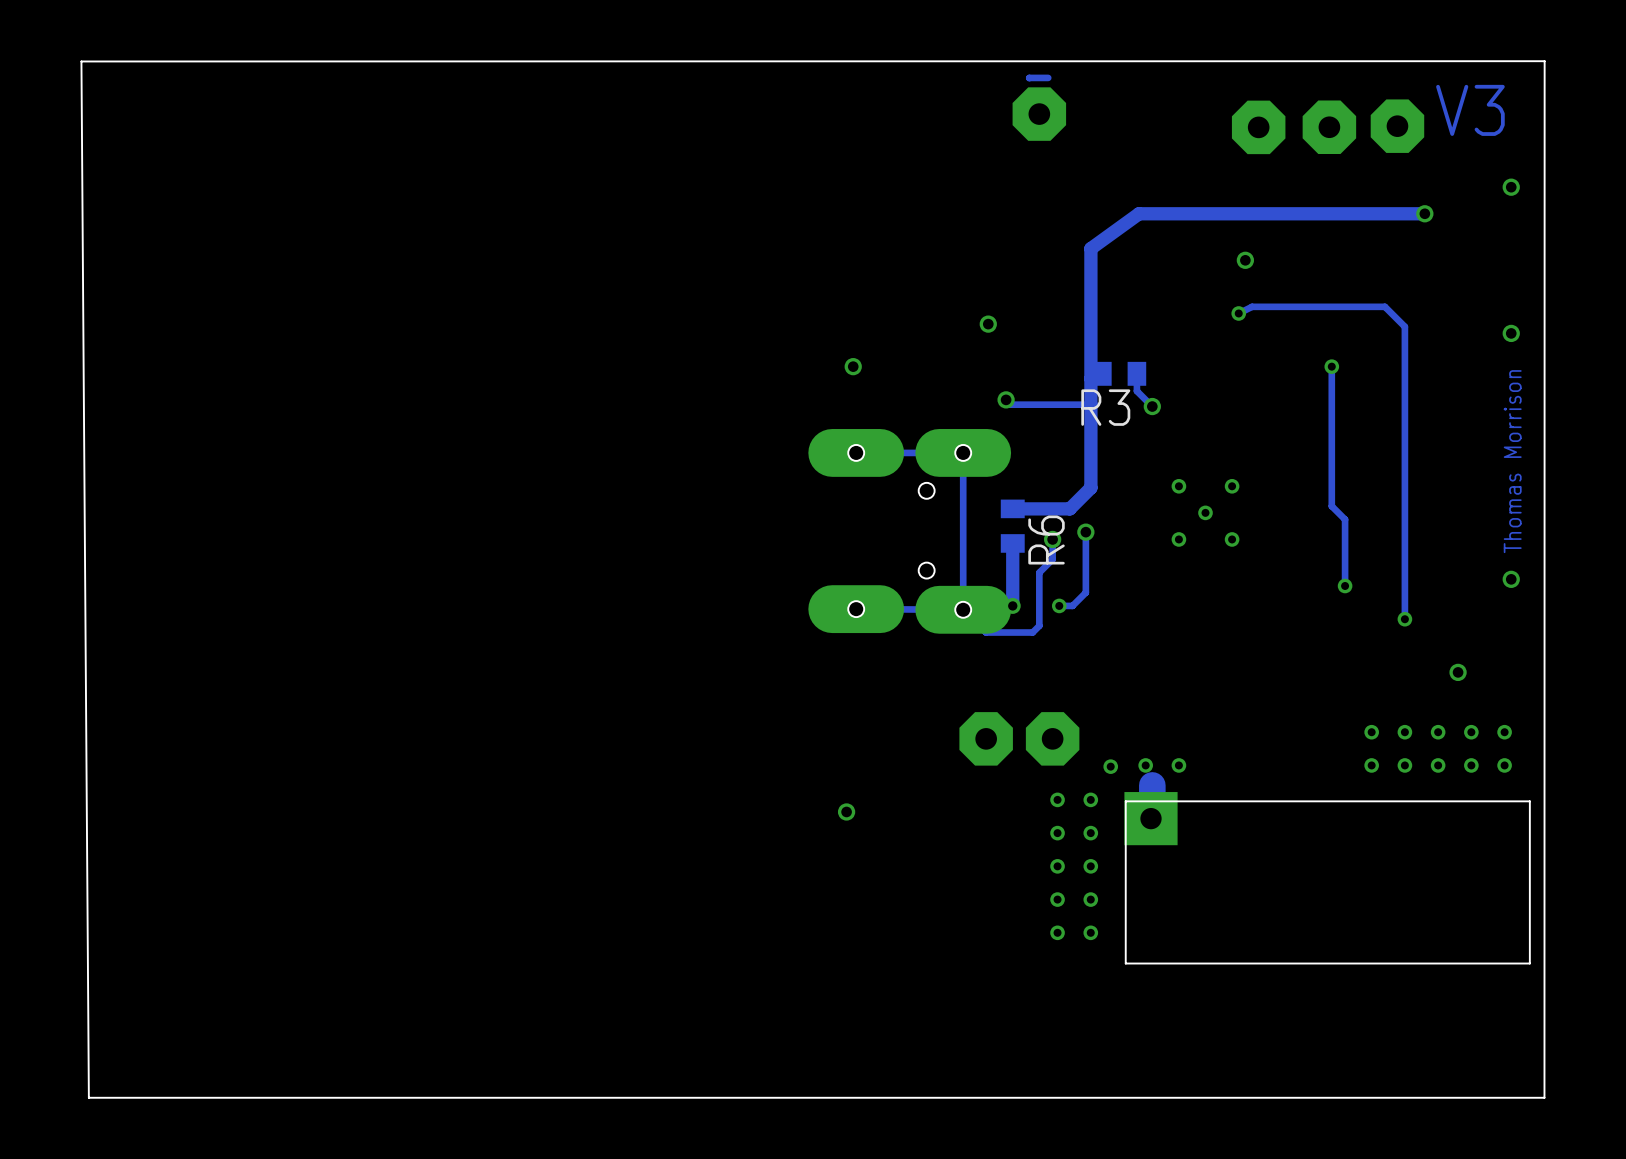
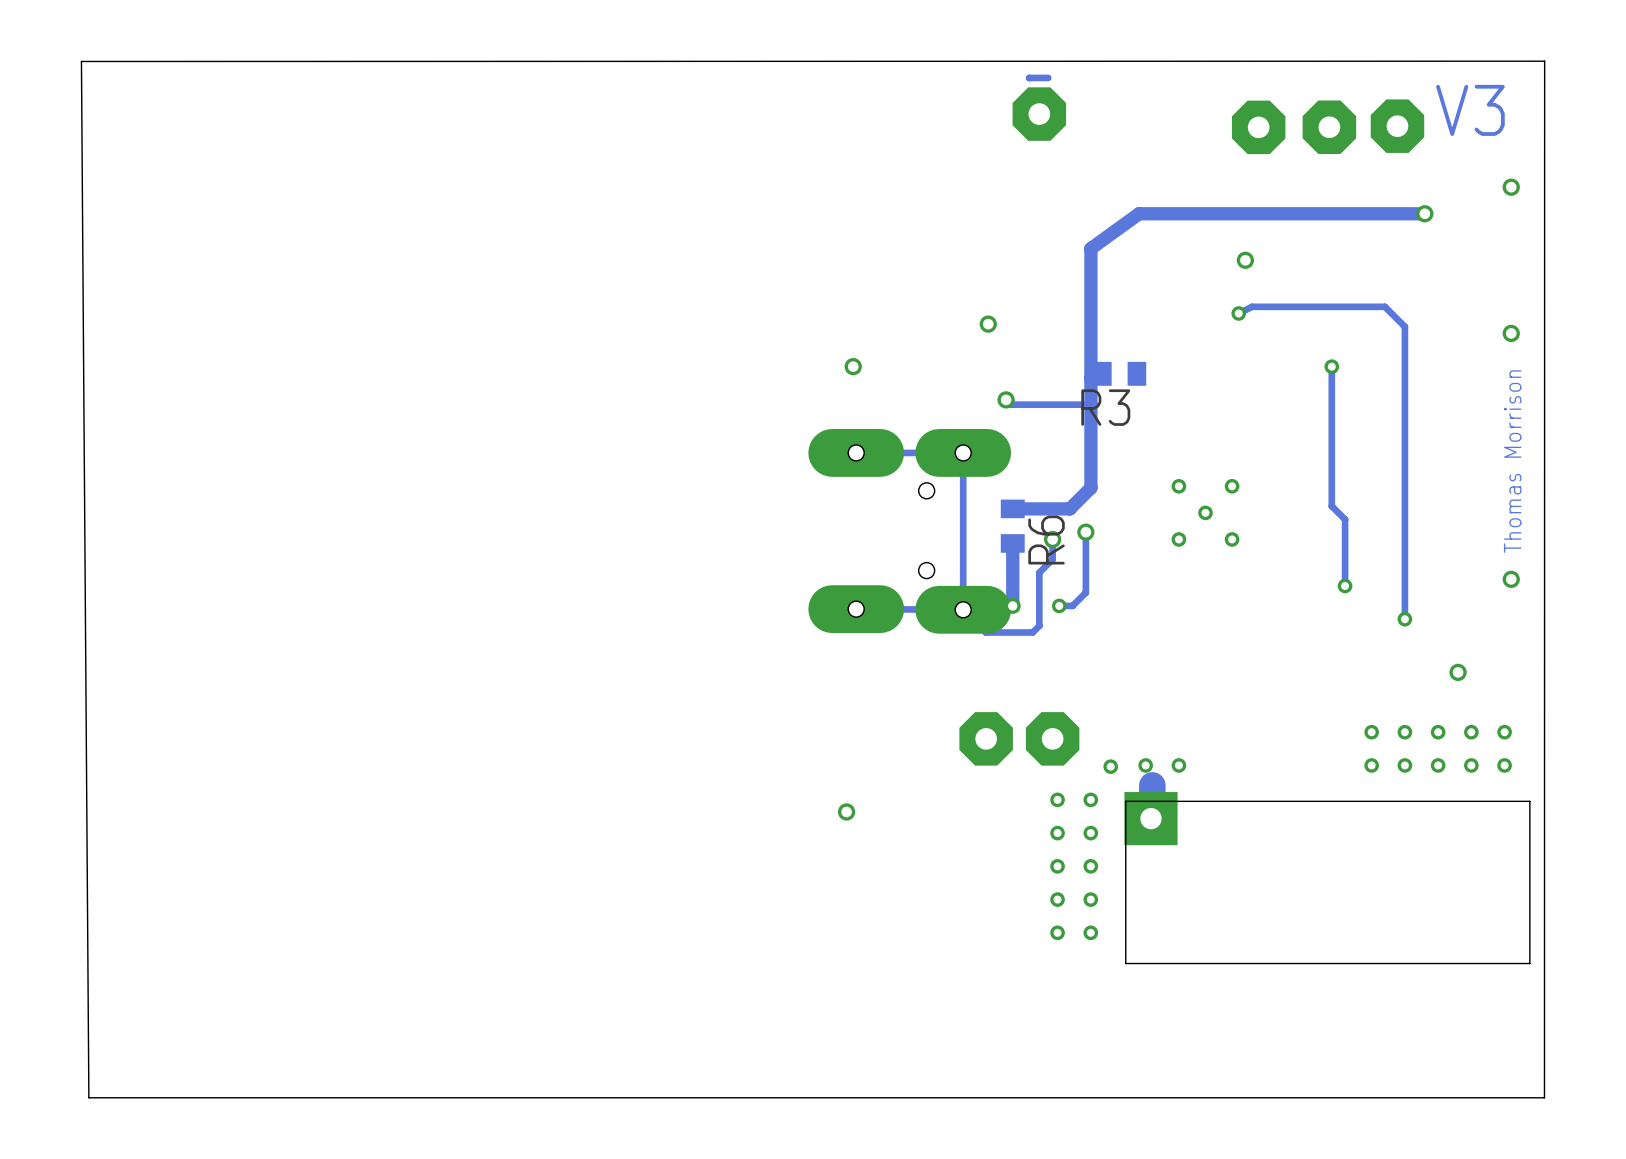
track: (1136, 373) (1136, 391) (1152, 406) -> none
via: (1152, 406) -> none

